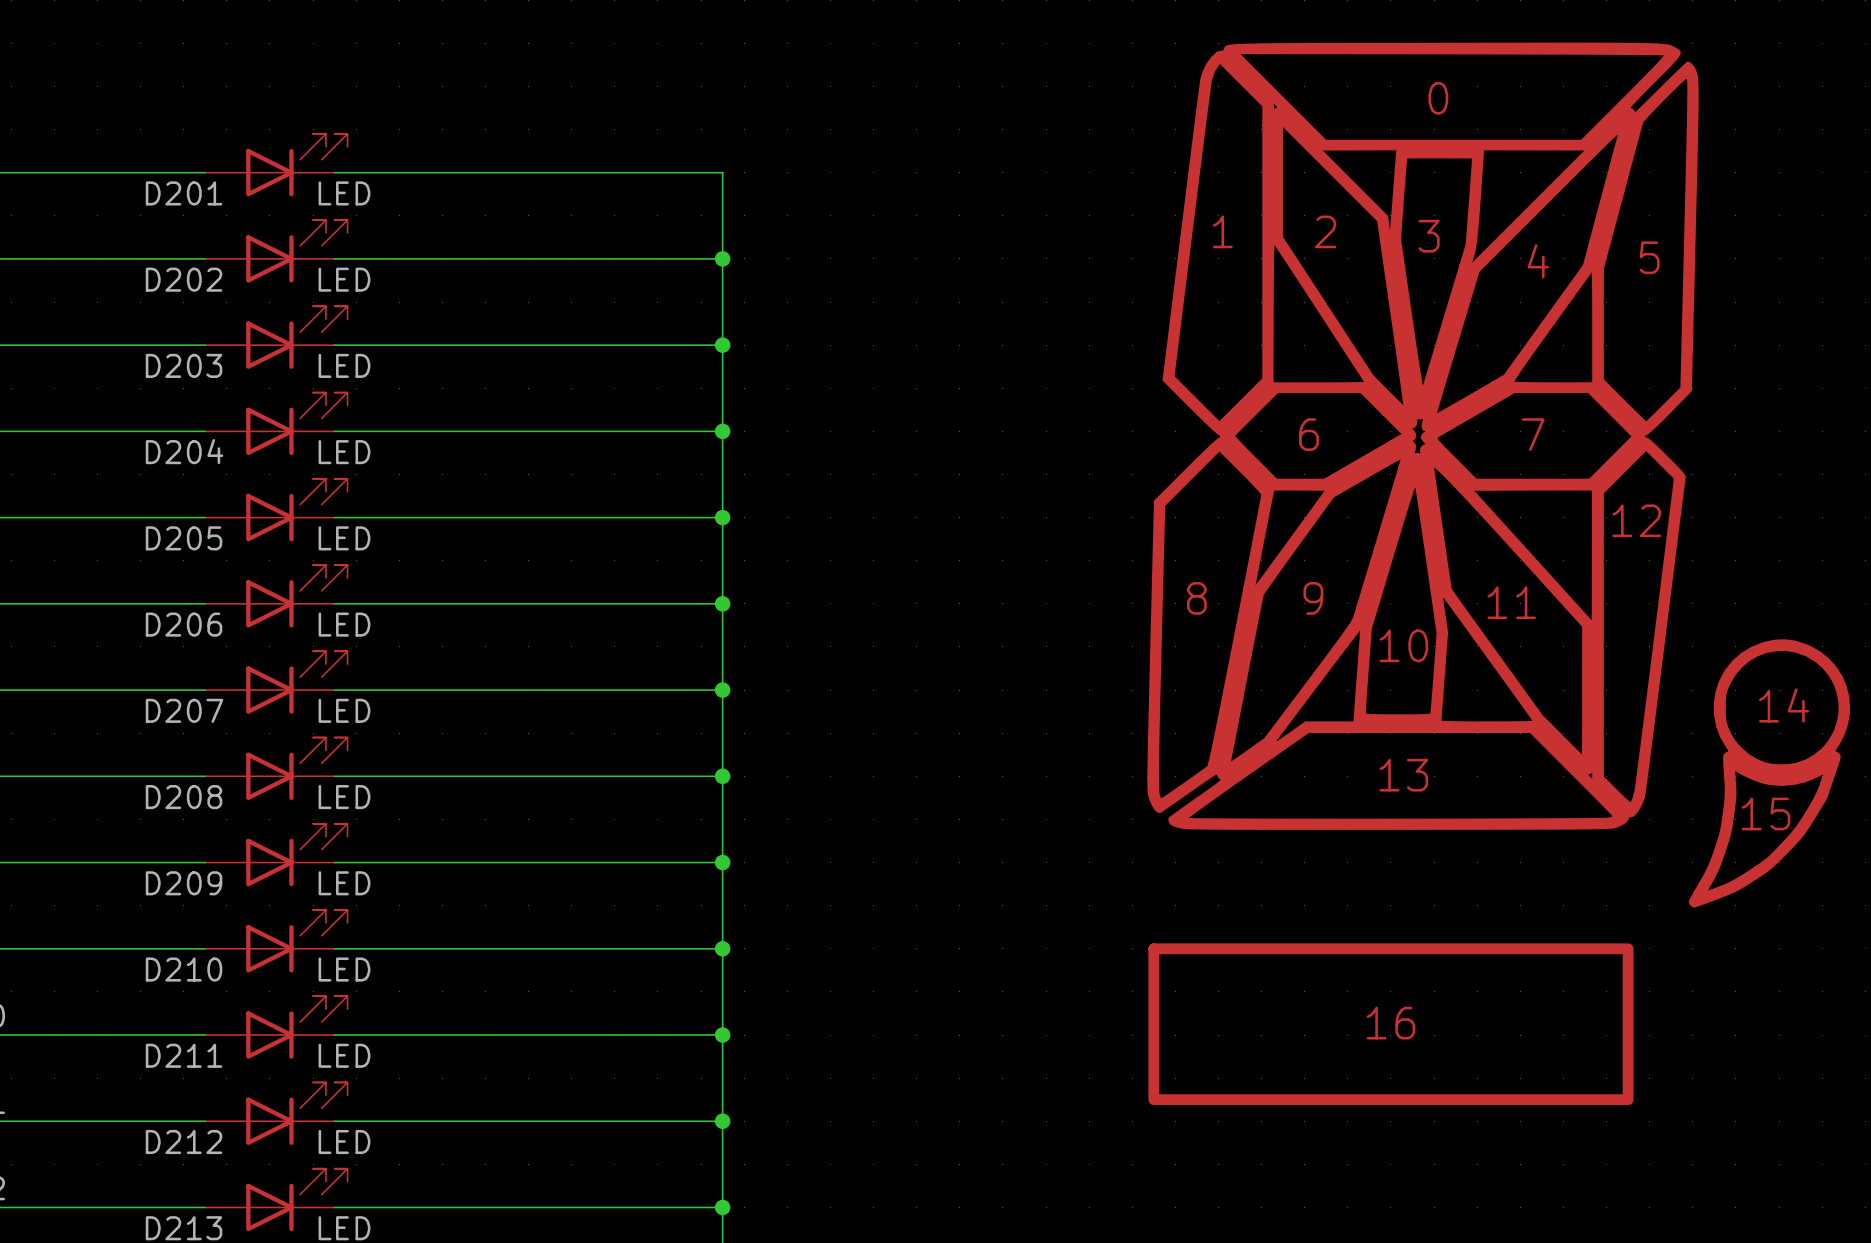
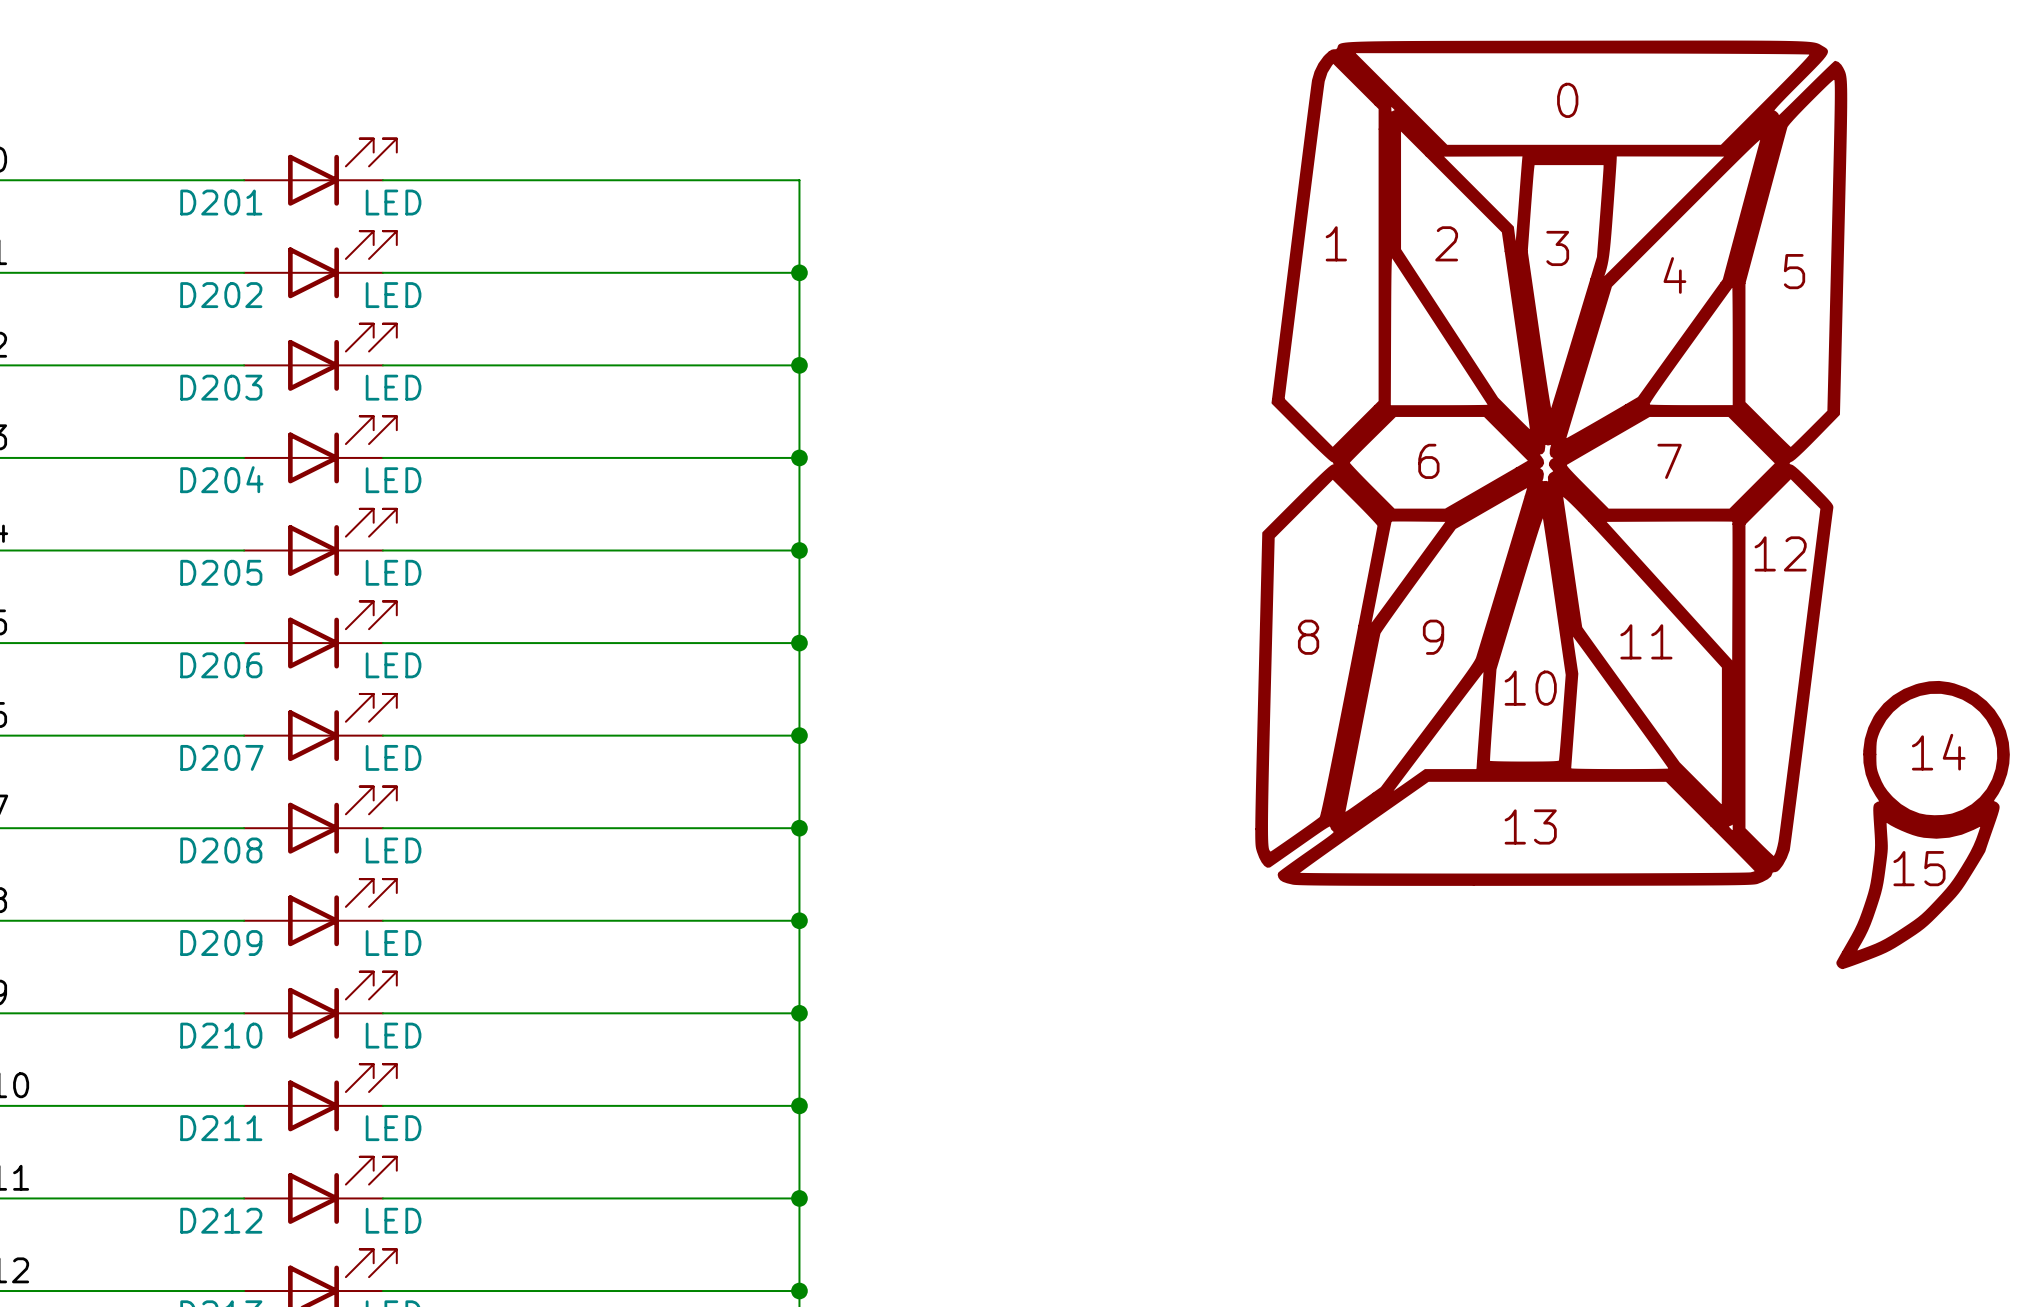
power symbol: (1498, 574) -> none

